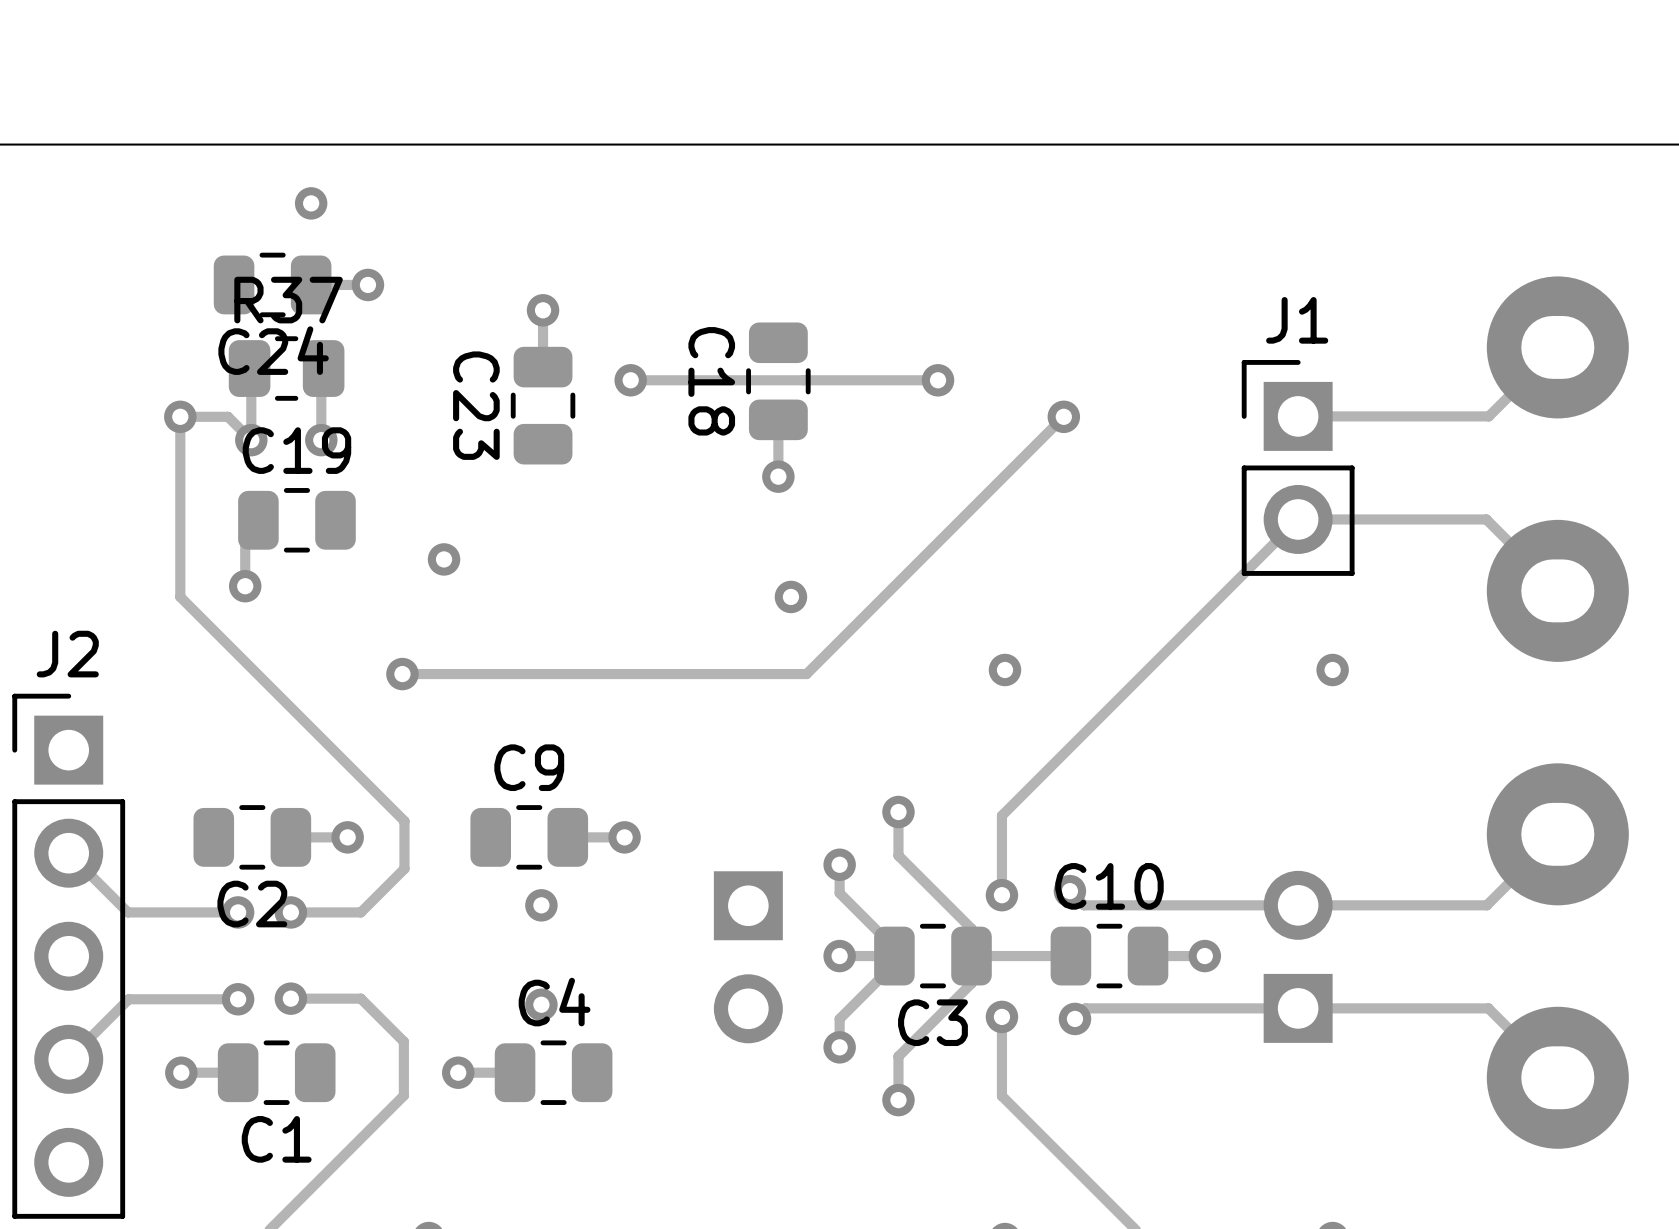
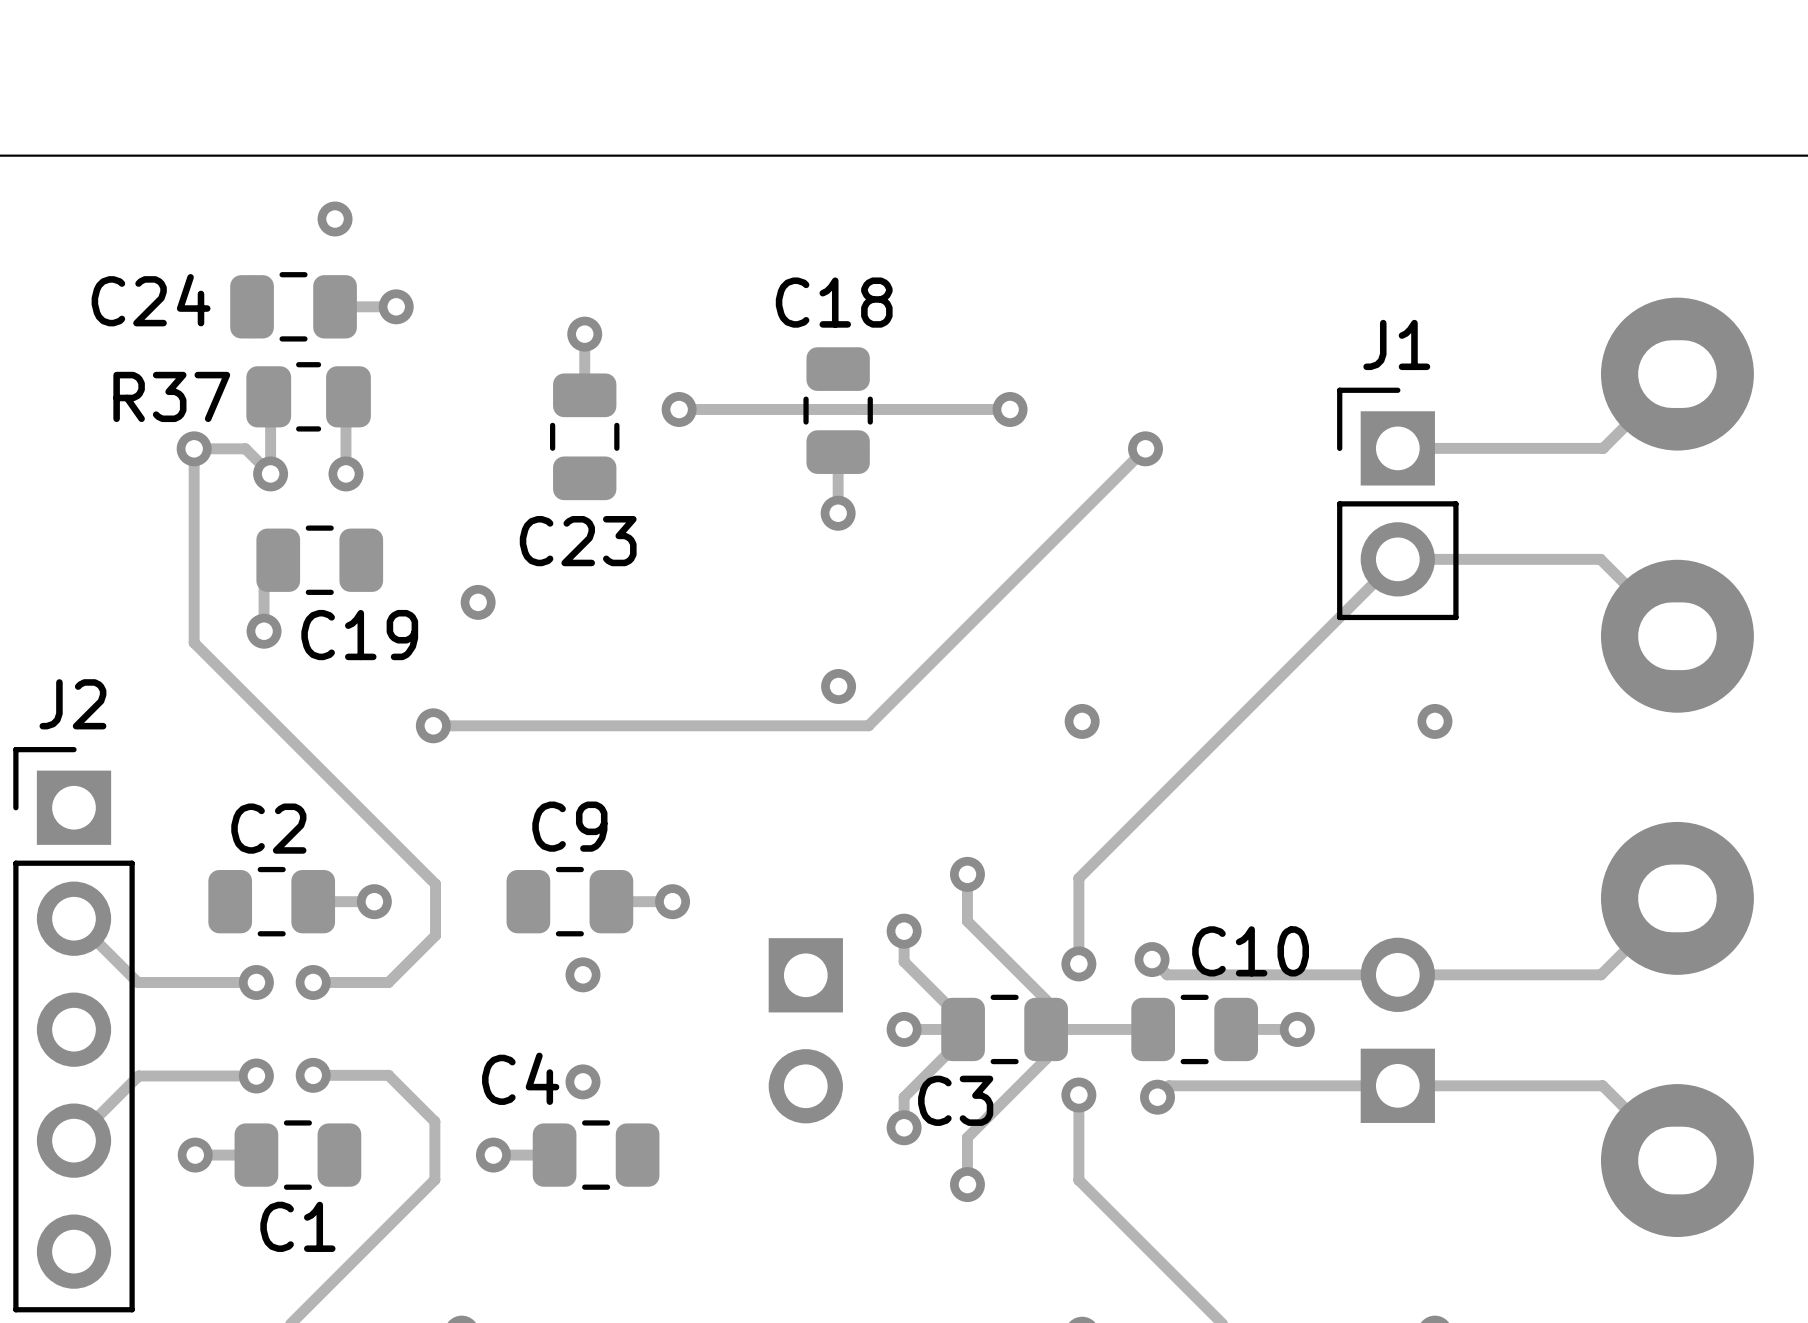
R37 name position: R37 (288, 300) -> R37 (171, 396)
C24 name position: C24 (273, 350) -> C24 (151, 300)
C18 name rotation: 0° (711, 381) -> 90° counterclockwise (834, 302)
C23 name rotation: 0° (476, 405) -> 90° counterclockwise (578, 541)
C19 name position: C19 (296, 450) -> C19 (359, 635)
via position: (790, 596) -> (838, 686)
C10 name position: C10 (1109, 886) -> C10 (1250, 951)
C2 name position: C2 (252, 904) -> C2 (268, 828)
C4 name position: C4 (554, 1002) -> C4 (520, 1078)
C3 name position: C3 (932, 1022) -> C3 (955, 1100)

